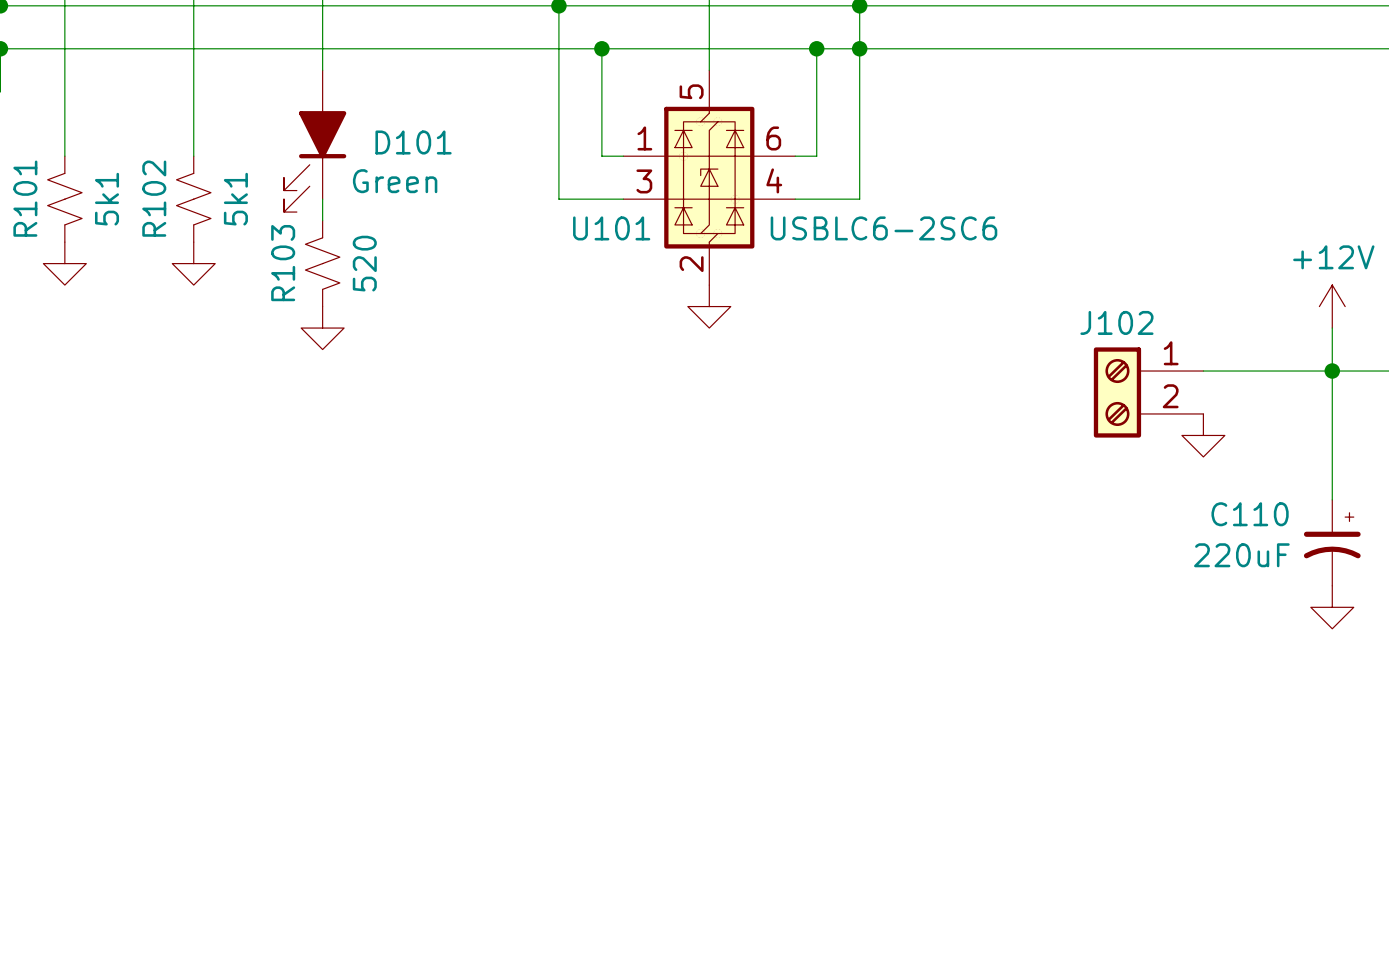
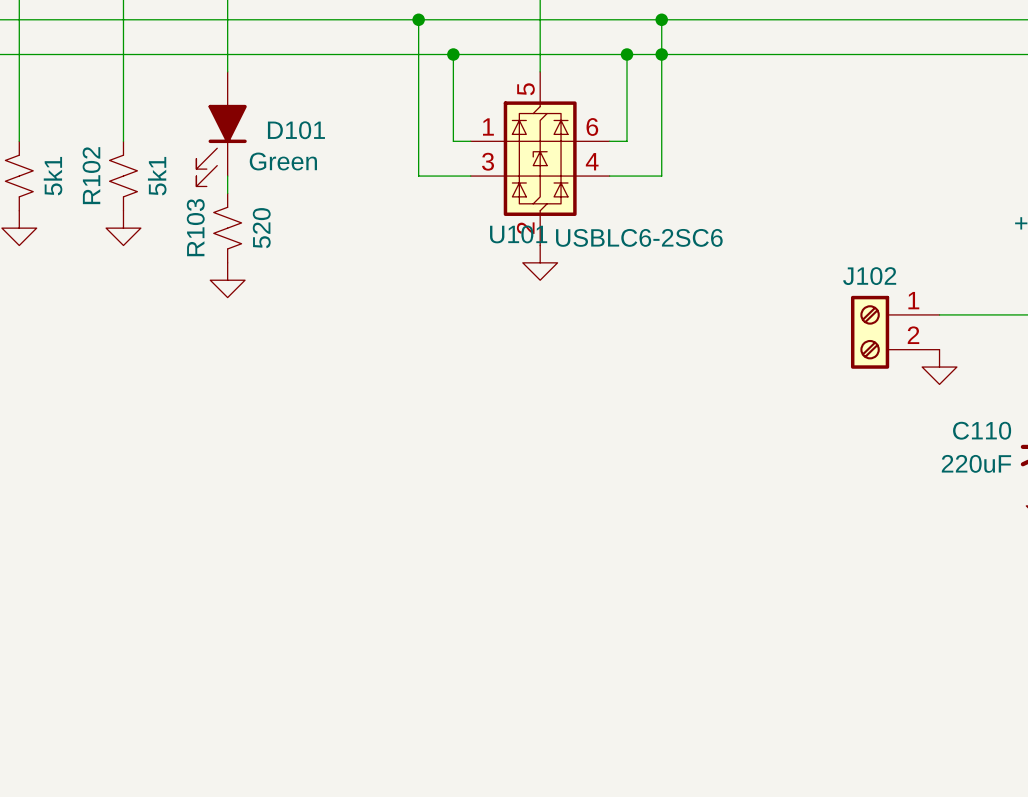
U101 name position: U101 (611, 228) -> U101 (518, 234)
U101 value position: USBLC6-2SC6 (883, 228) -> USBLC6-2SC6 (639, 237)

